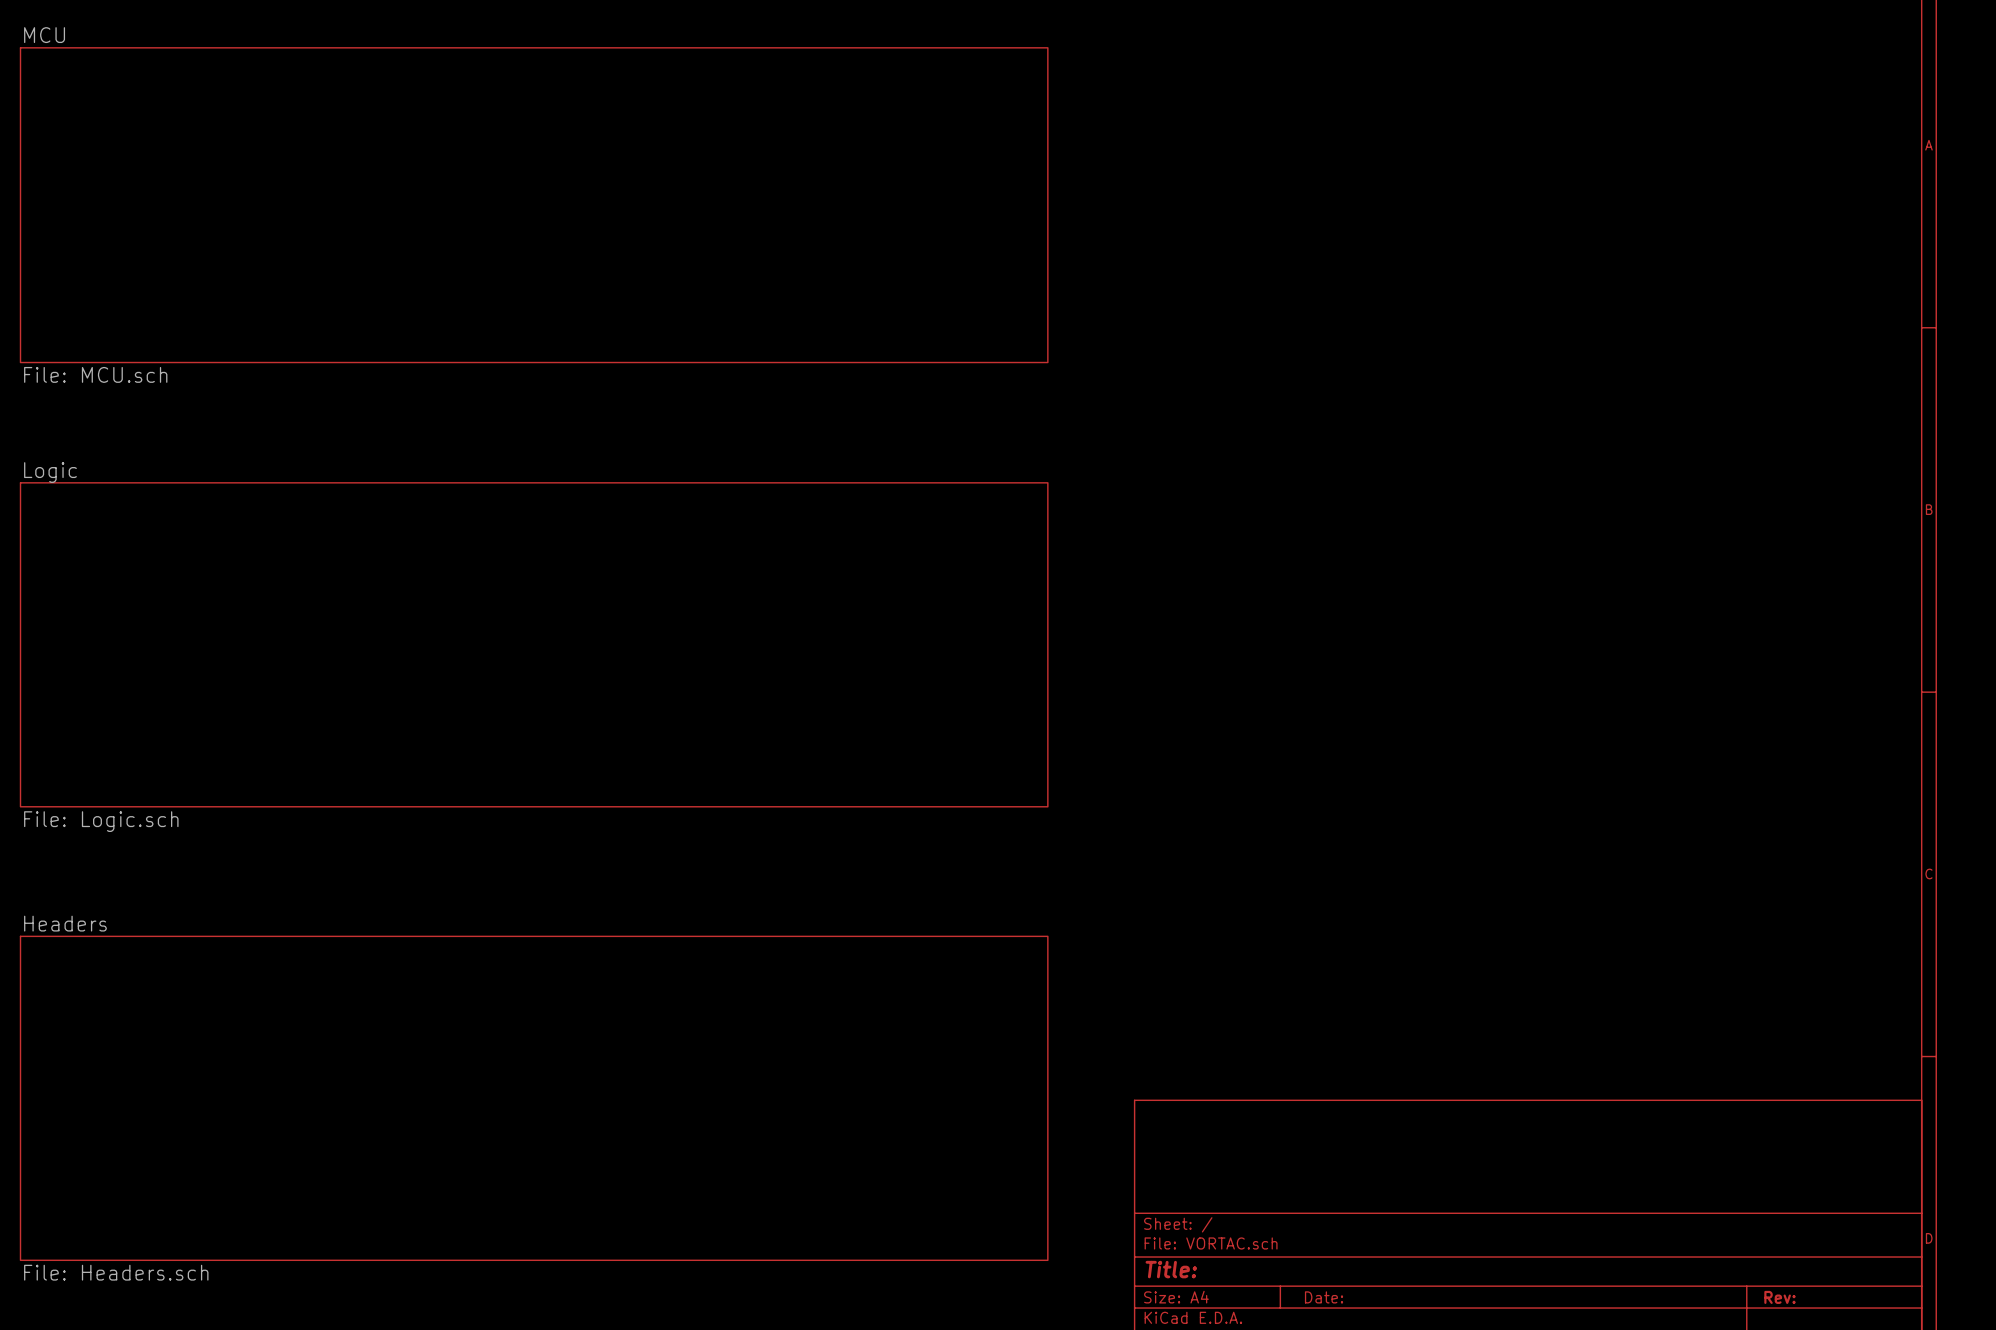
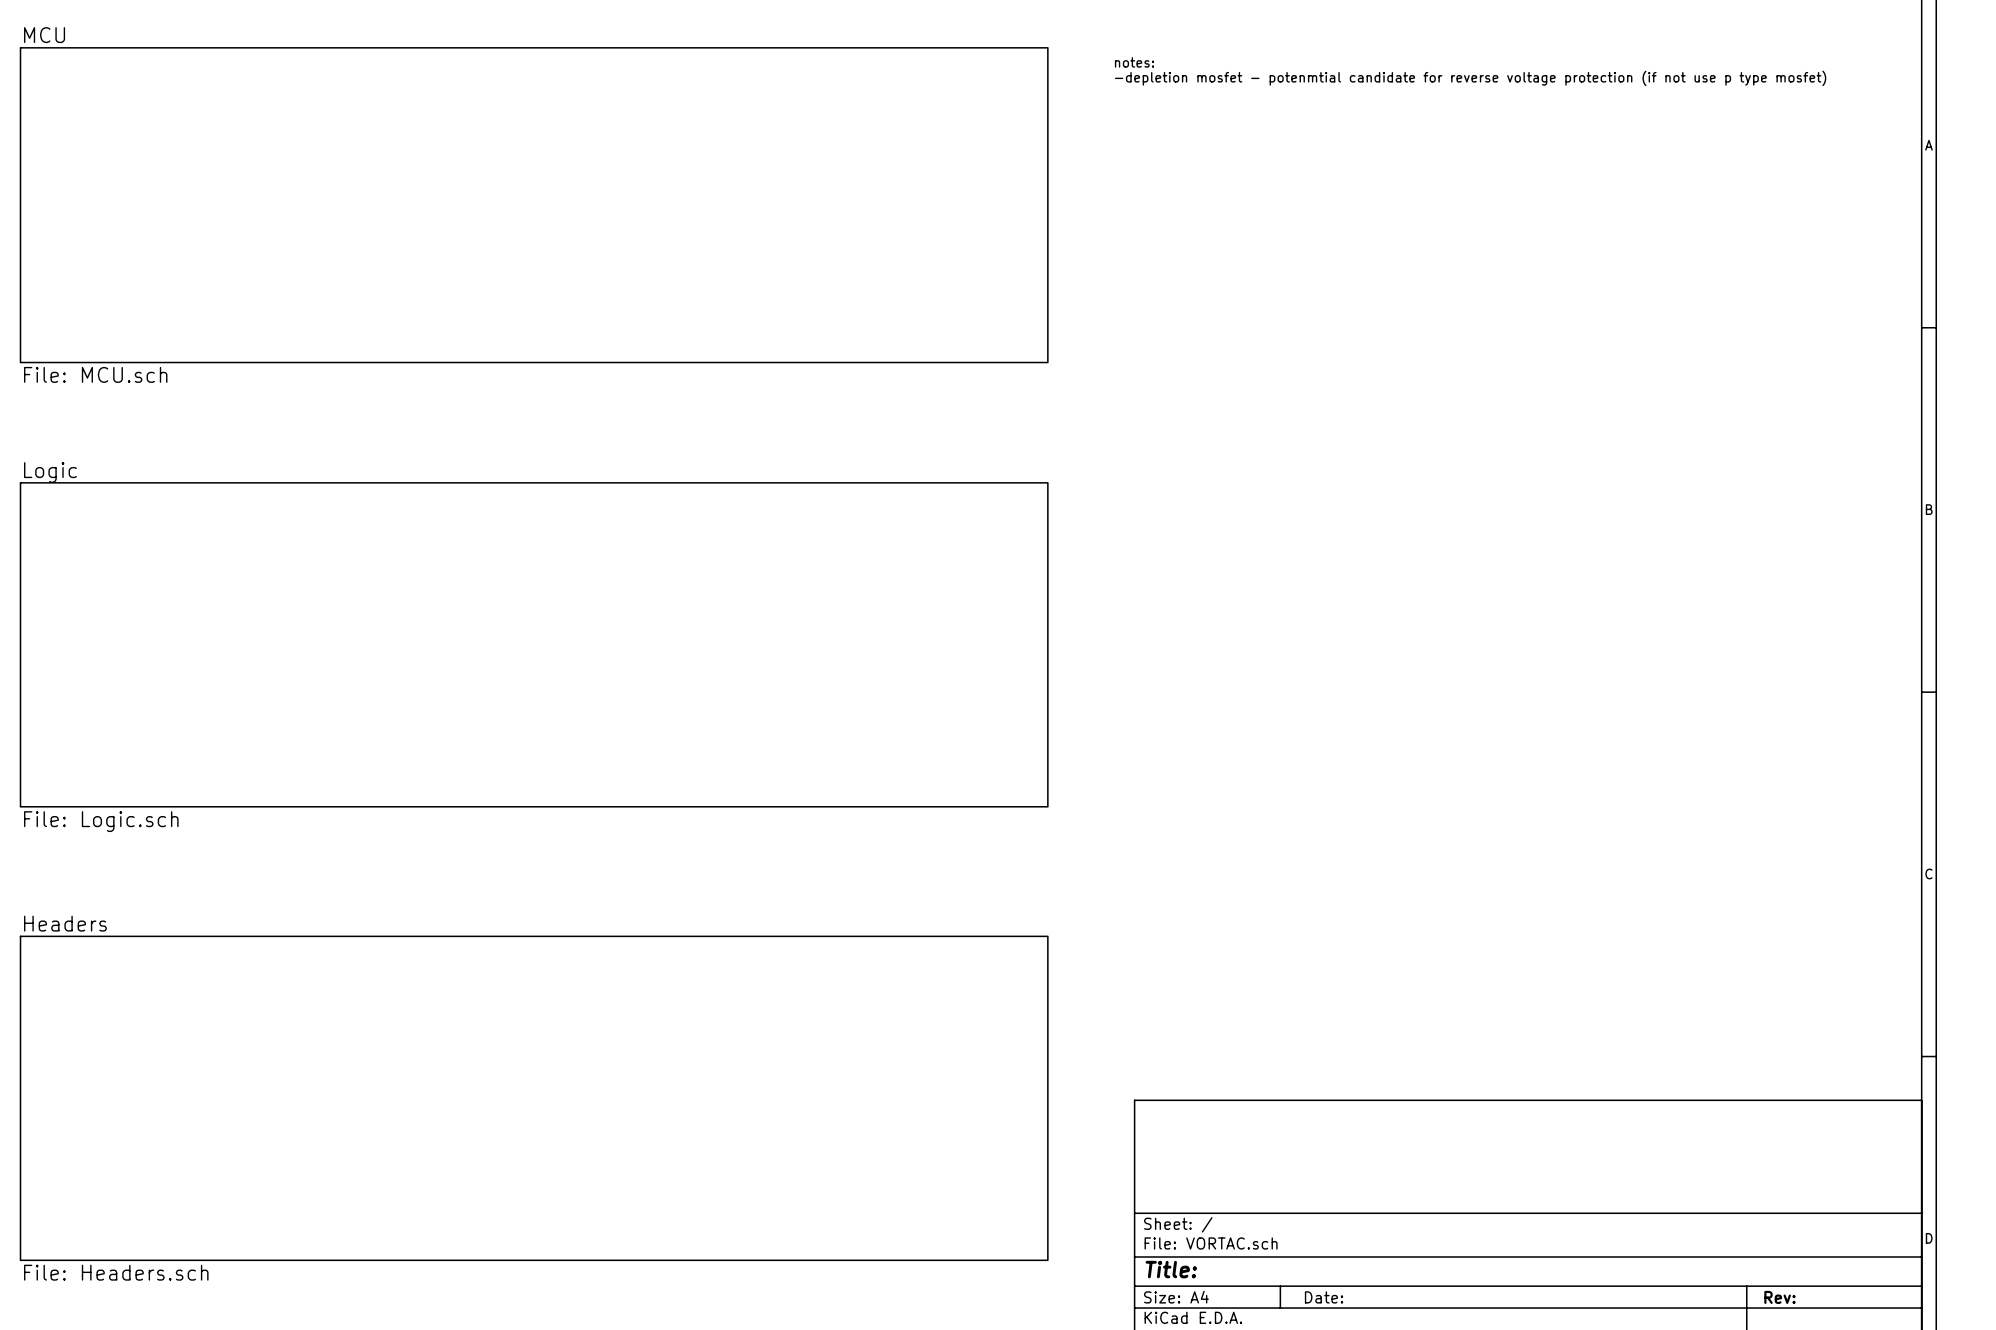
text: none -> notes: (1134, 62)
text: none -> -depletion mosfet - potenmtial candidate for reverse voltage protection (if not use p type mosfet) (1470, 78)

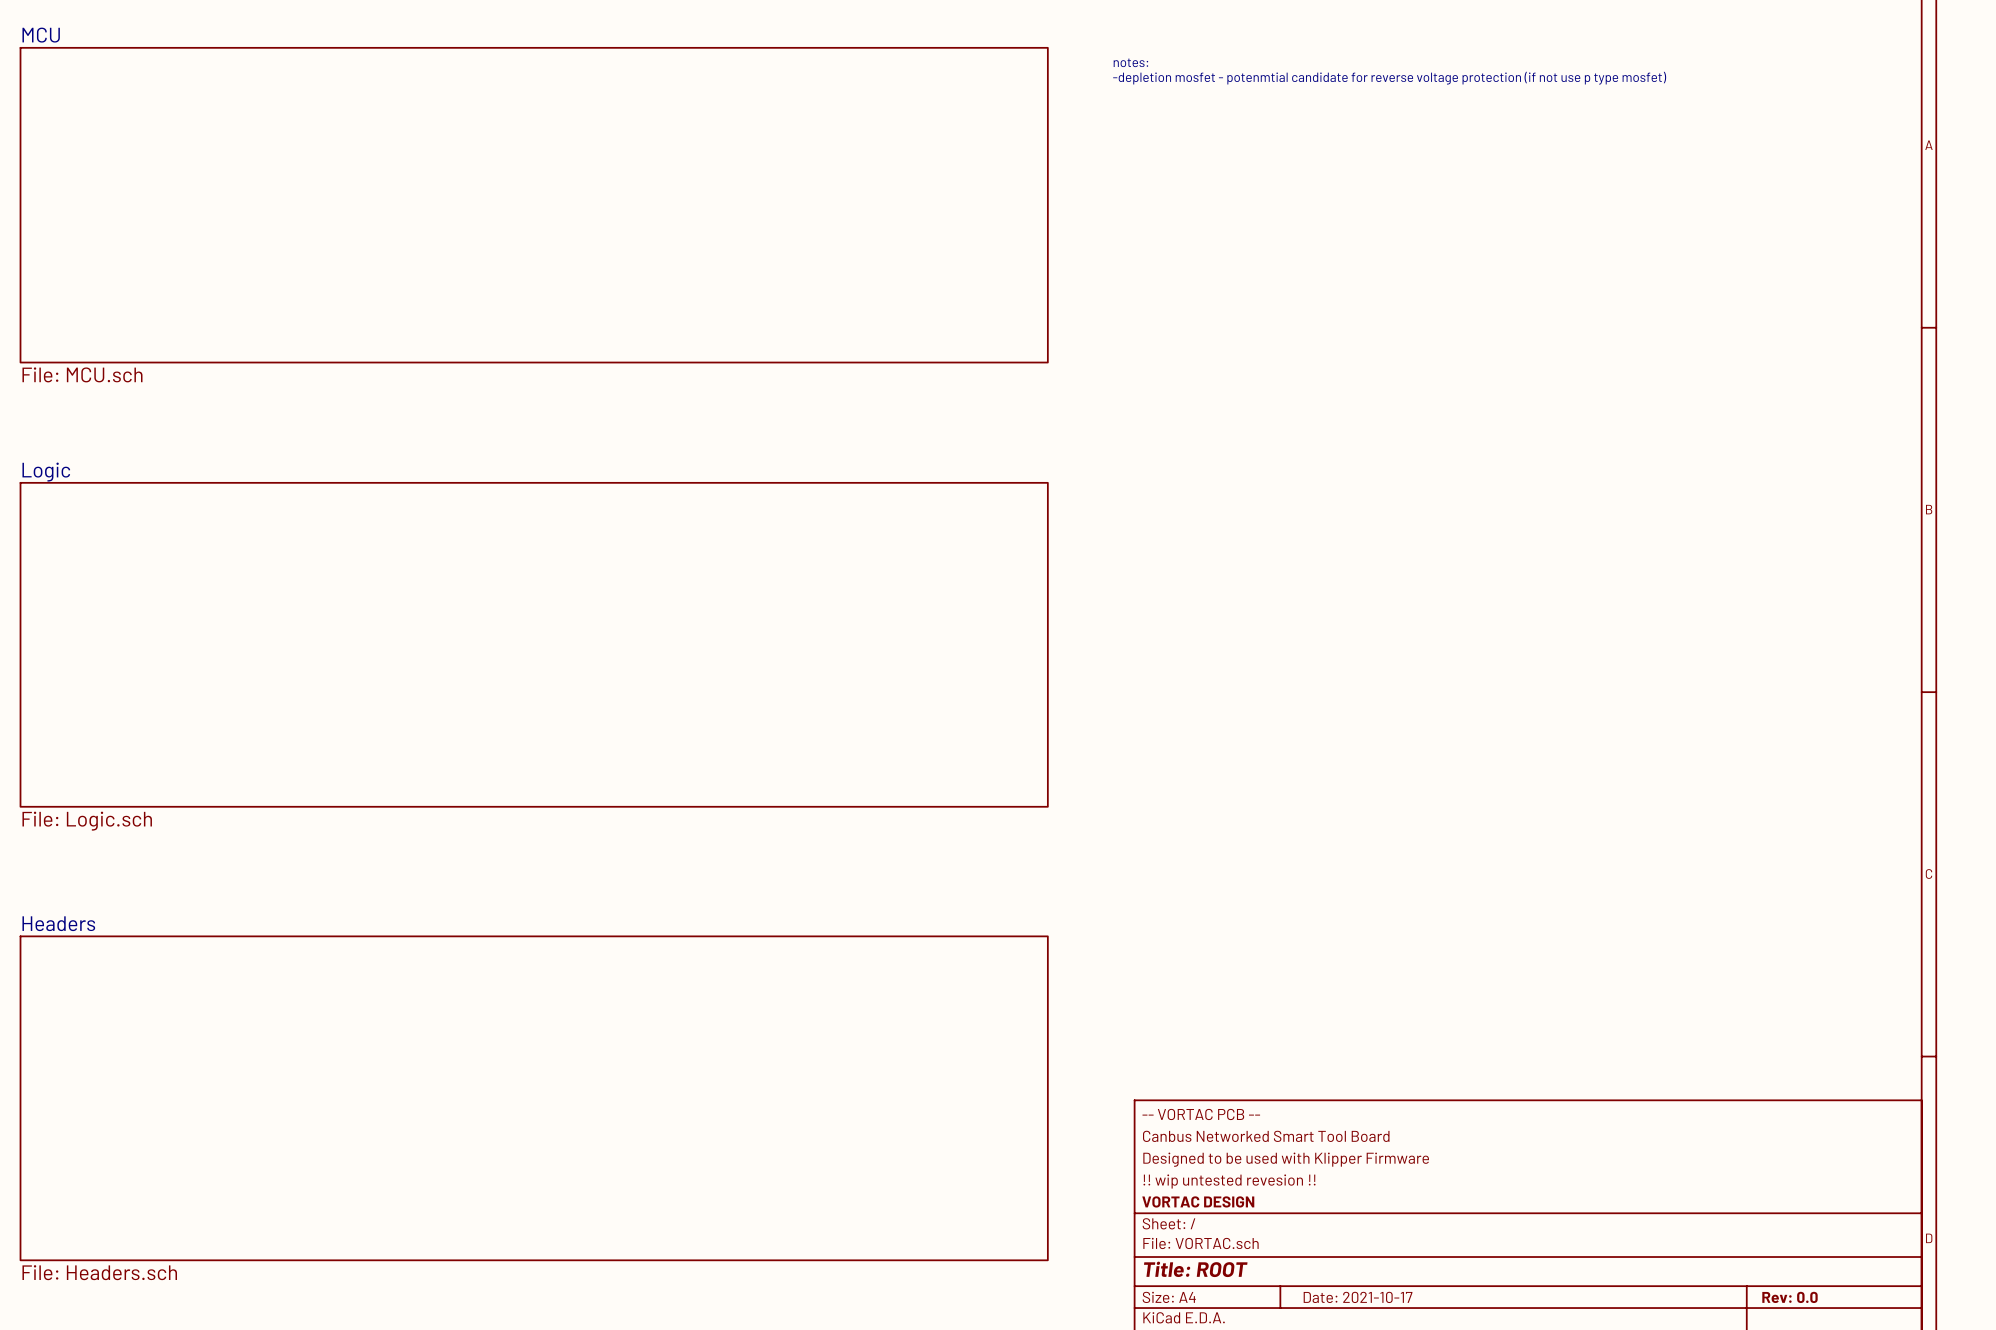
title block: none -> -- VORTAC PCB -- (1201, 1114)
title block: none -> Canbus Networked Smart Tool Board (1266, 1136)
title block: none -> Designed to be used with Klipper Firmware (1286, 1159)
title block: none -> !! wip untested revesion !! (1229, 1181)
title block: none -> VORTAC DESIGN (1198, 1201)
title block: Title: (1171, 1269) -> Title: ROOT (1195, 1269)
title block: Date: (1324, 1297) -> Date: 2021-10-17 (1358, 1297)
title block: Rev: (1779, 1297) -> Rev: 0.0 (1789, 1297)

